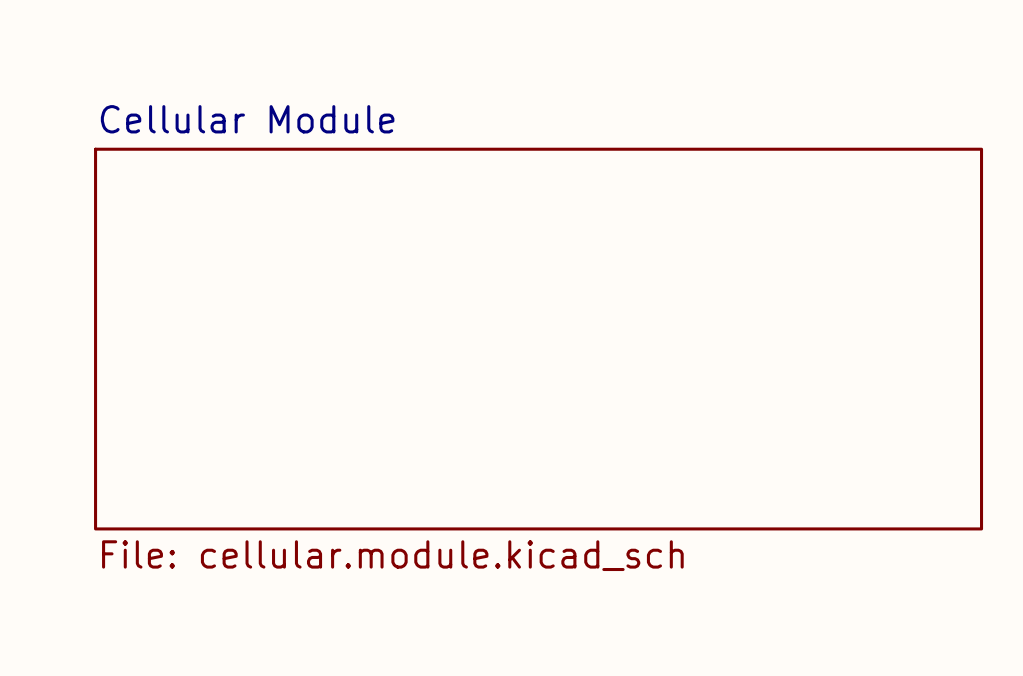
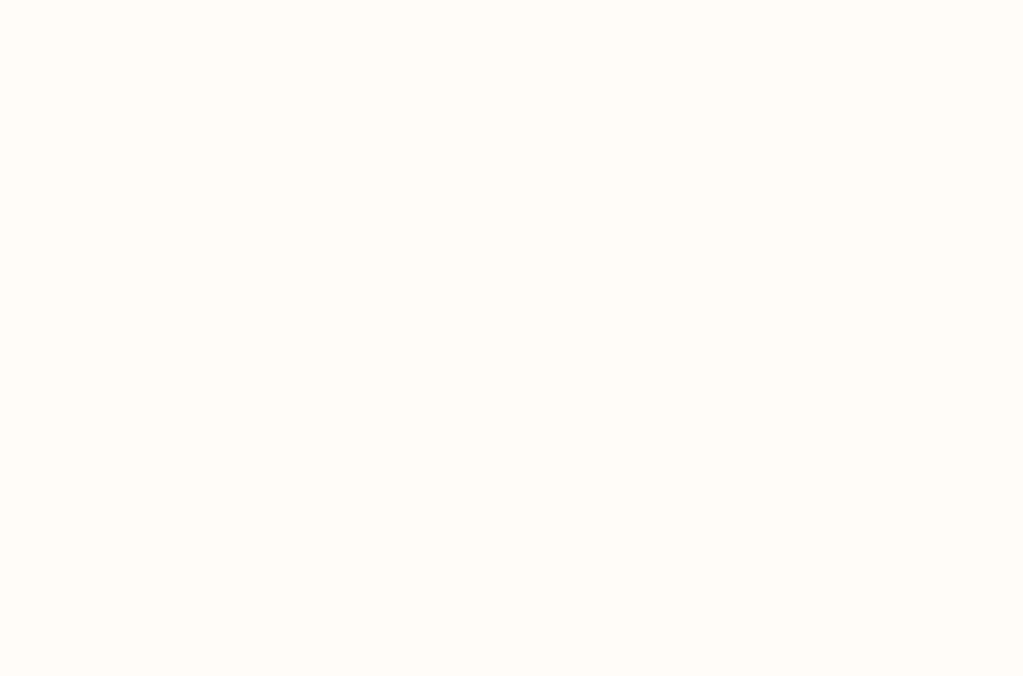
sheet Cellular Module: File: cellular.module.kicad_sch (538, 339) -> none

